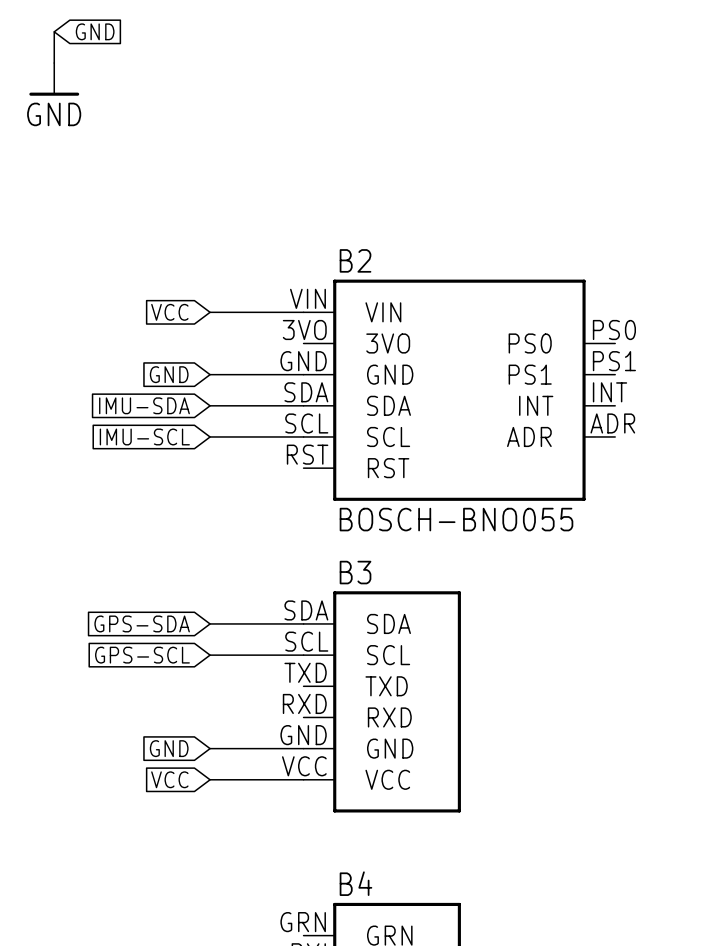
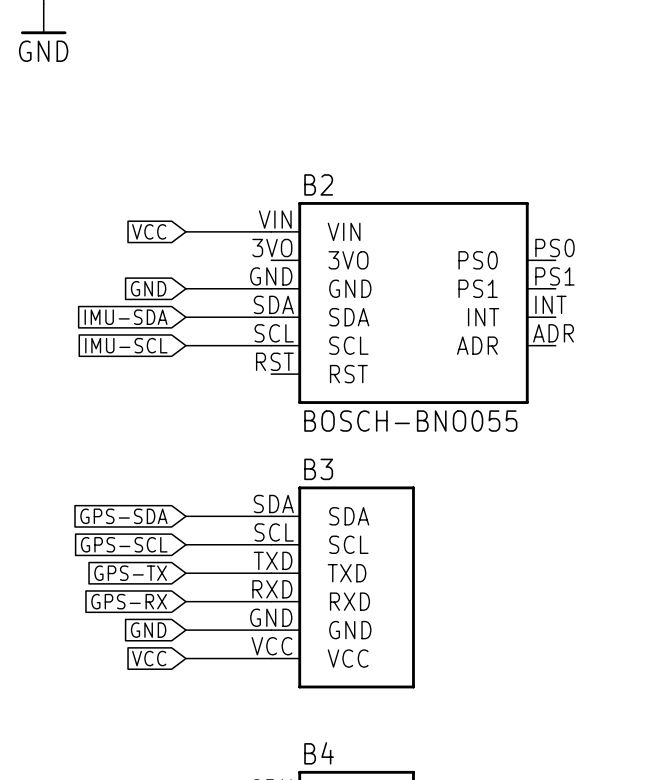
global label: none -> GPS-TX (130, 573)
wire: none -> (185, 573) (271, 573)
global label: none -> GPS-RX (129, 601)
wire: none -> (185, 601) (271, 601)

